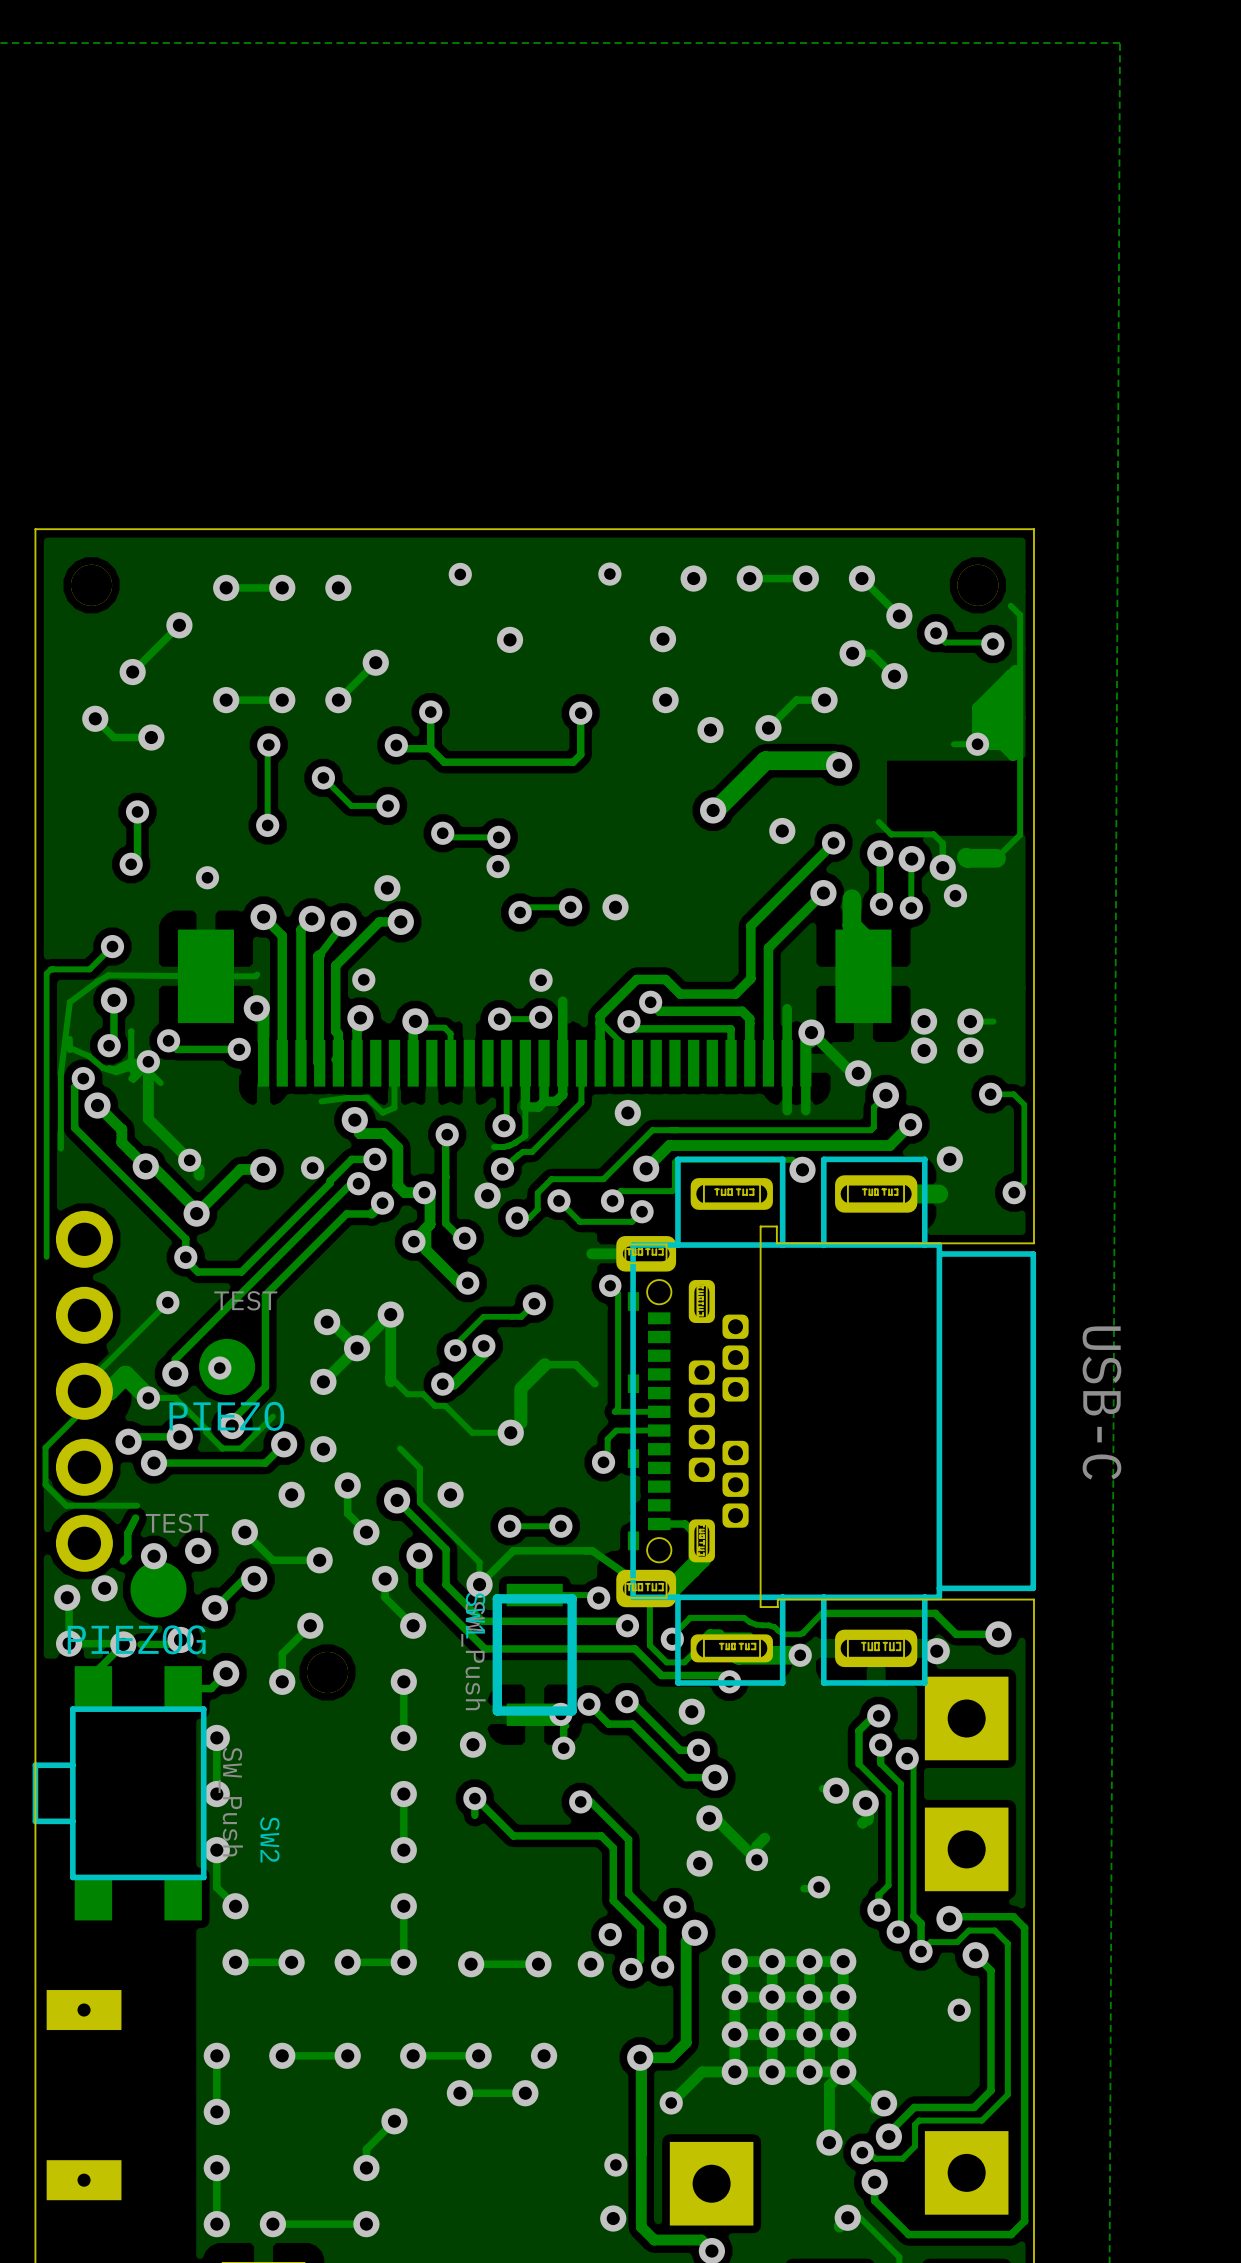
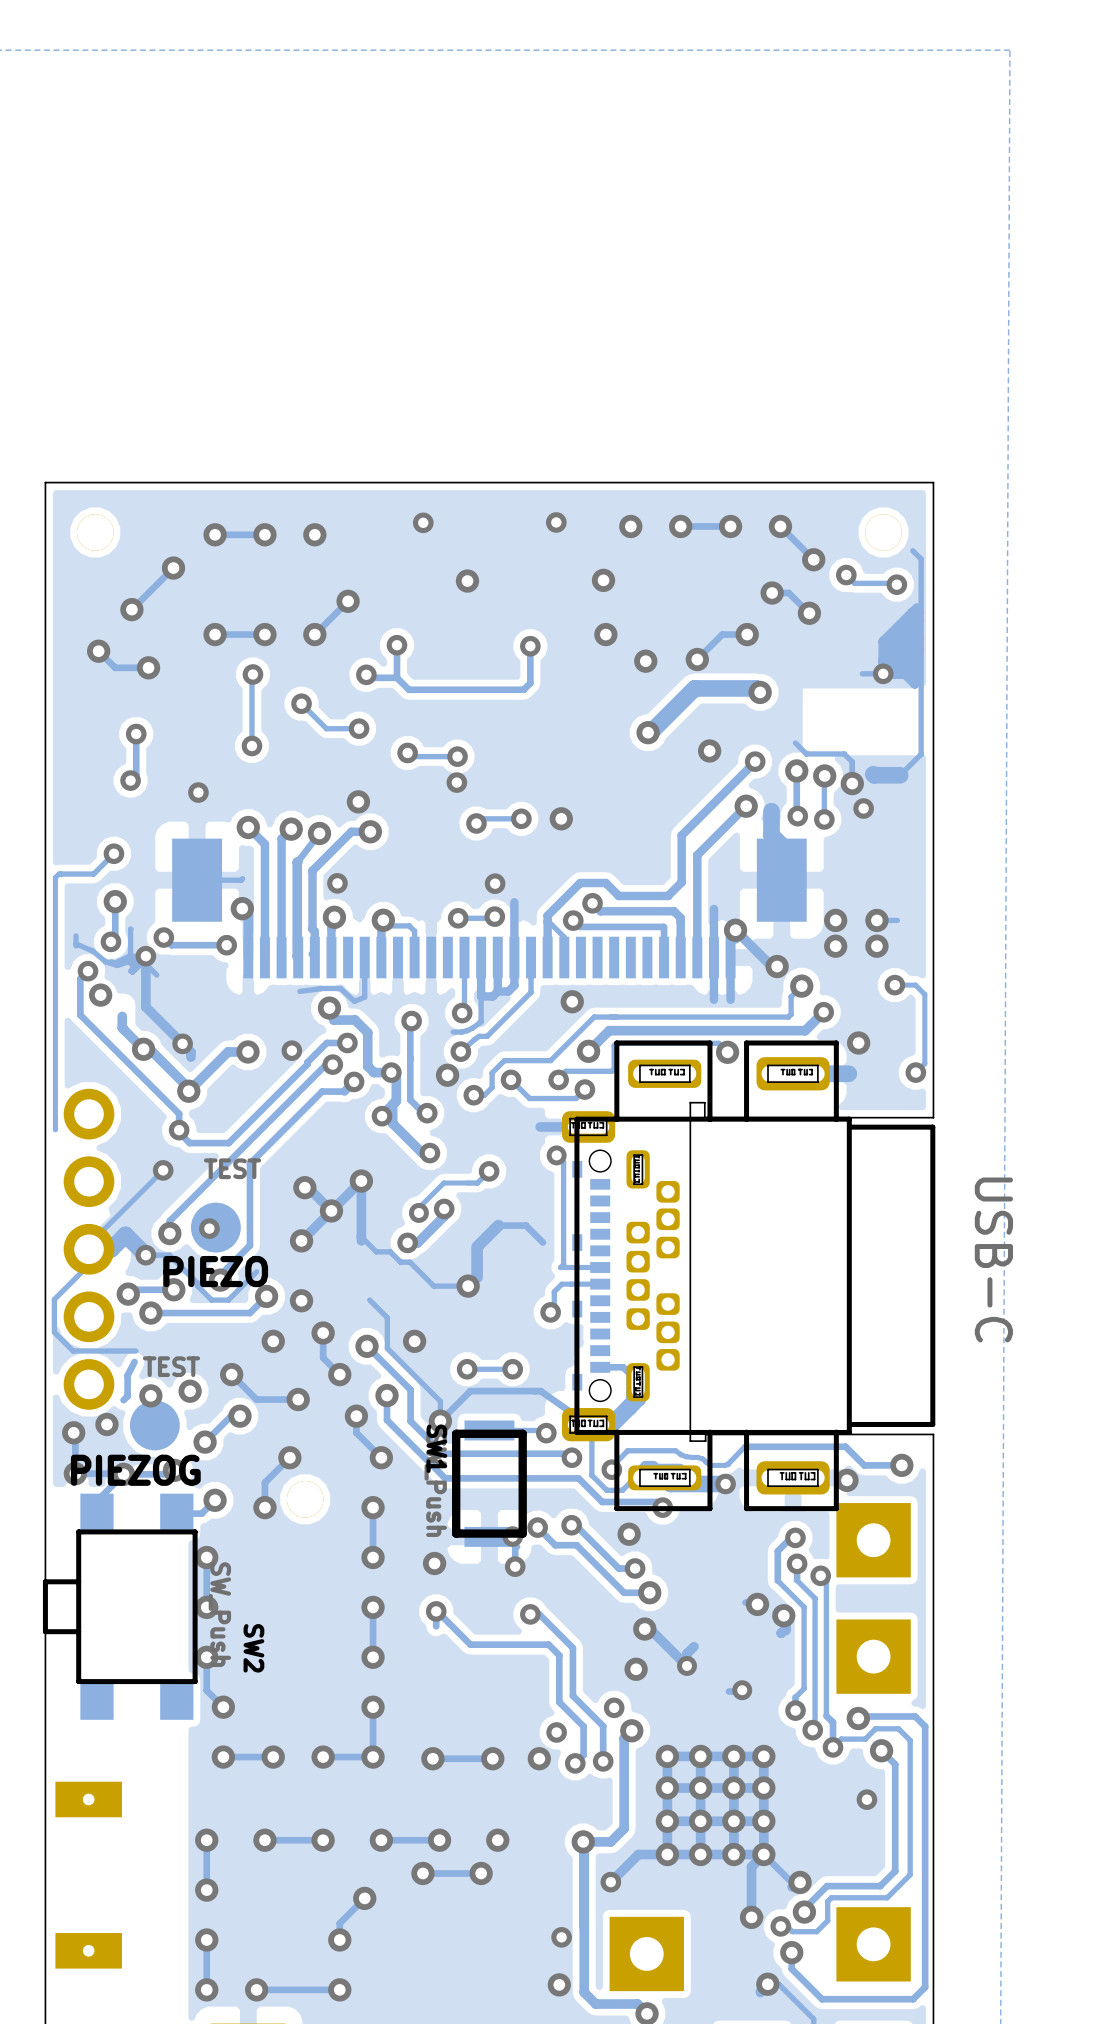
track: (205, 976) (108, 975) (69, 1002) (60, 1074) (60, 1148) -> none
track: (97, 1105) (121, 1129) -> none

